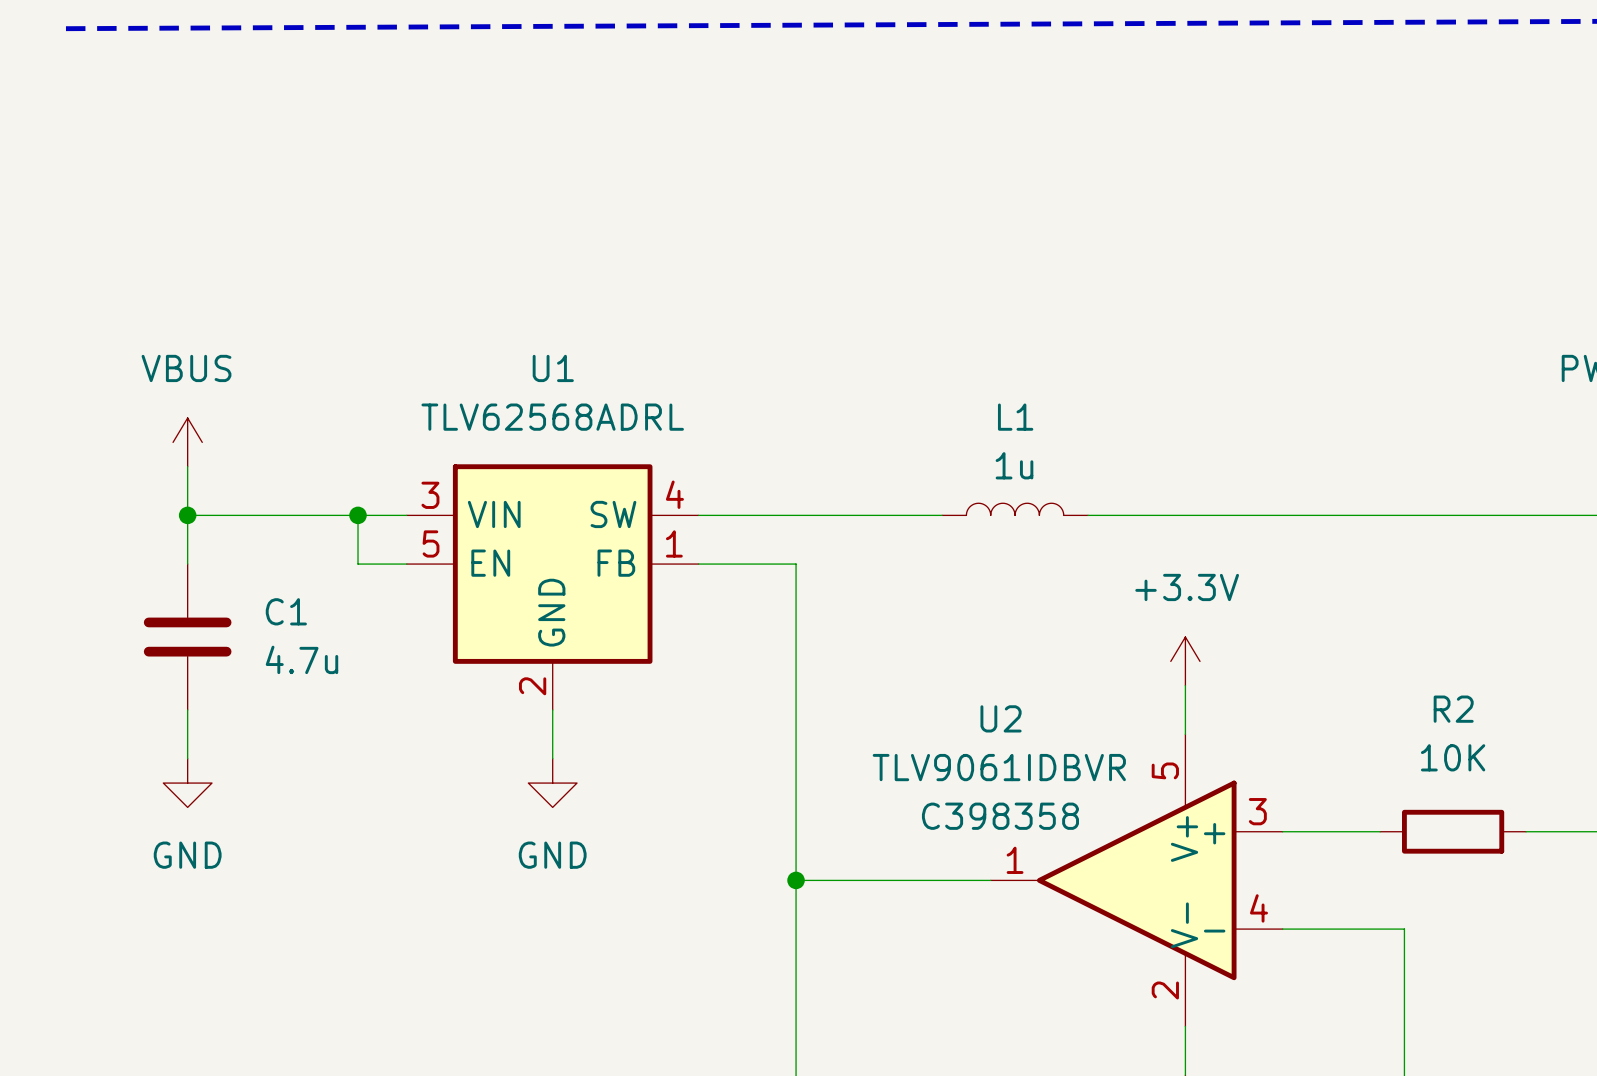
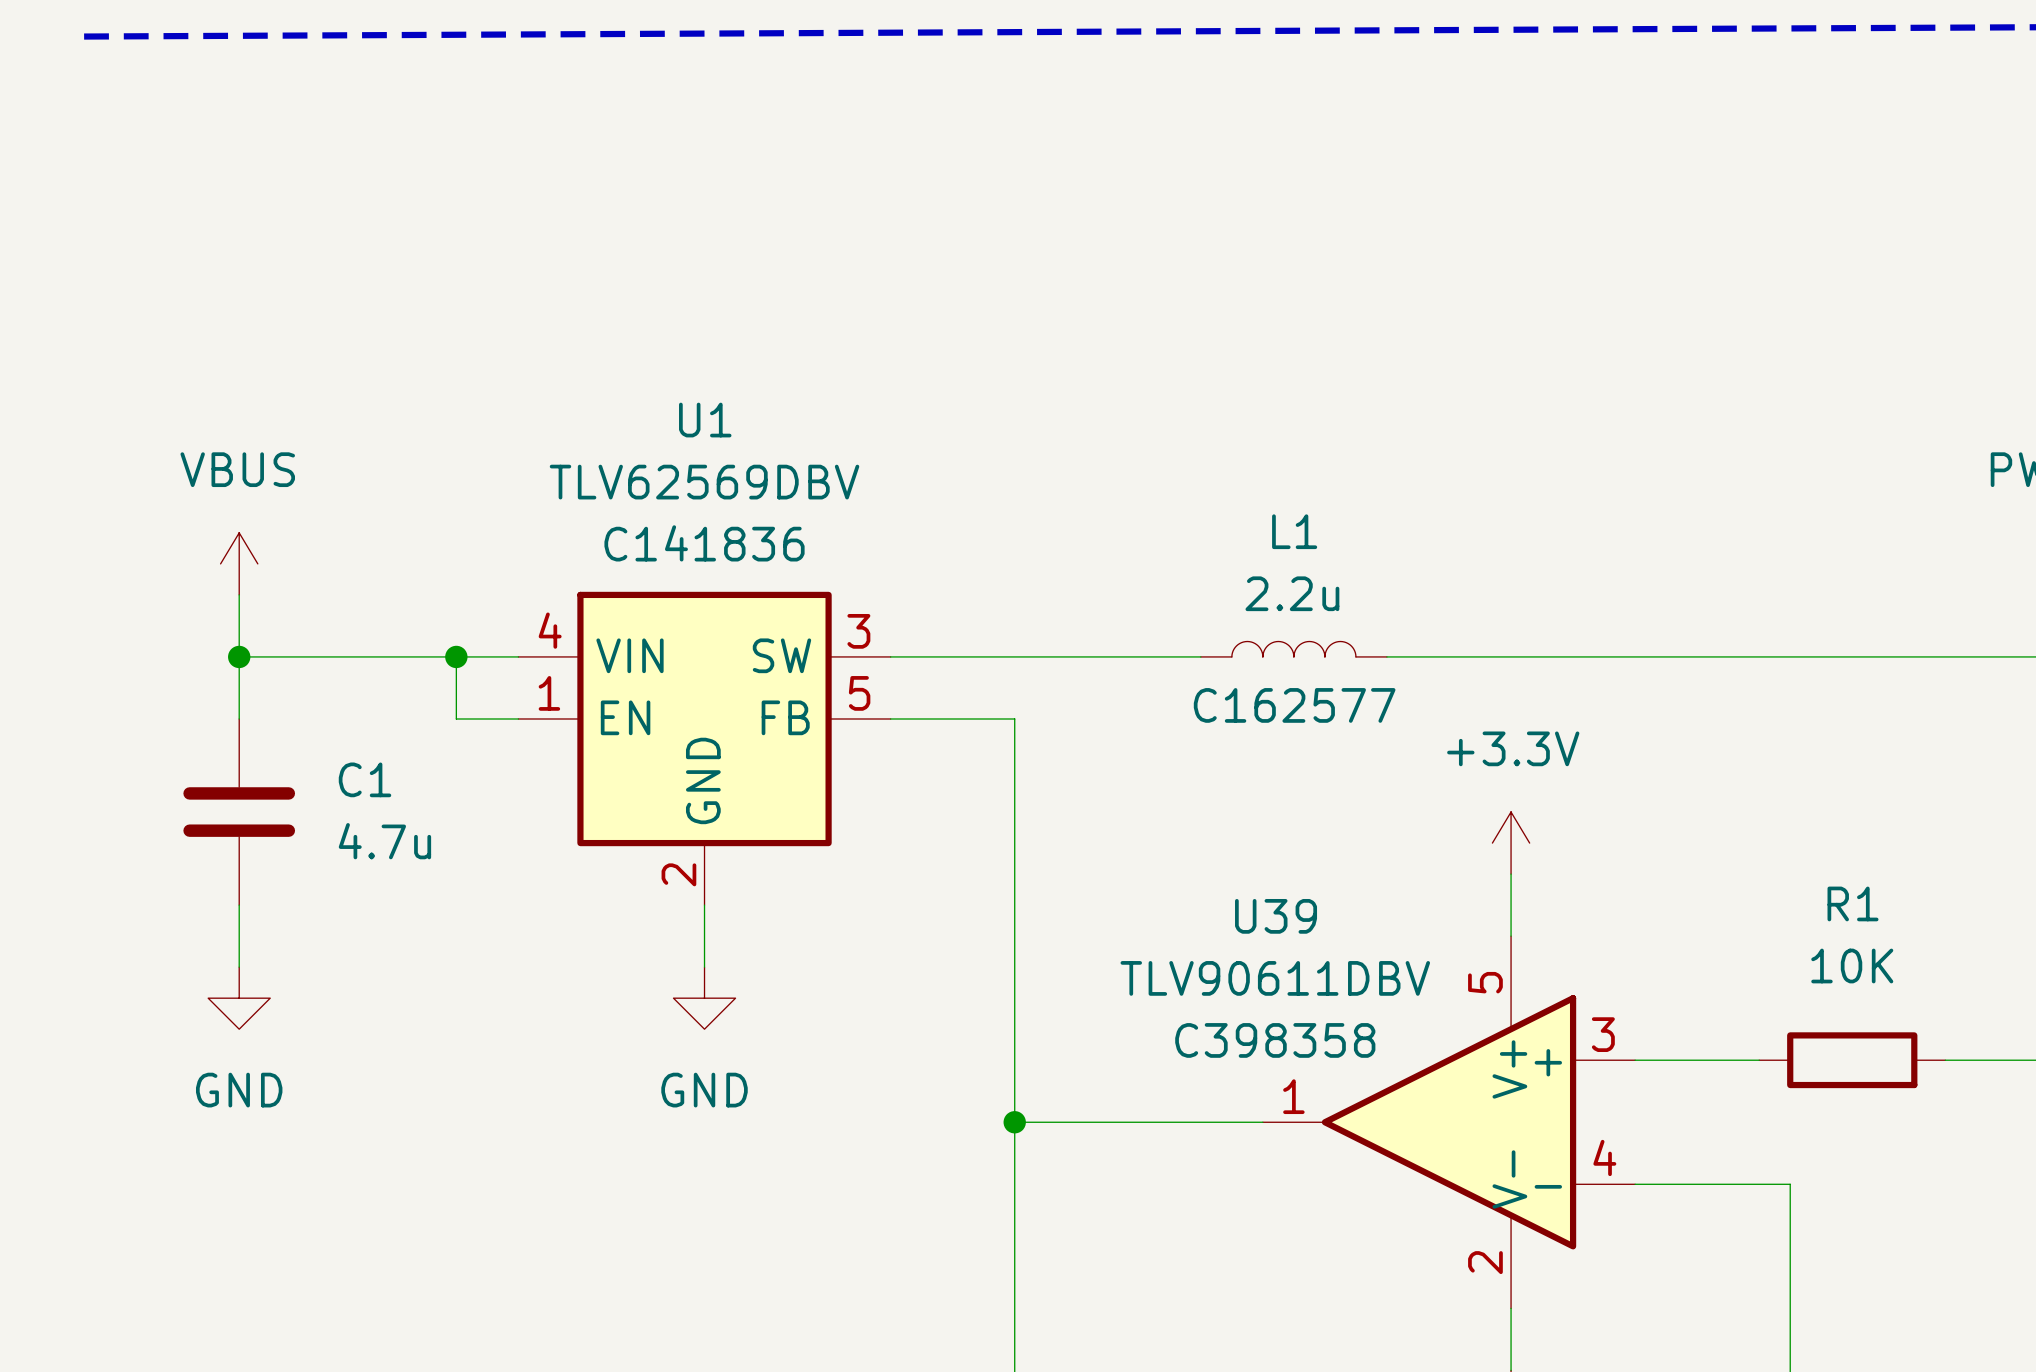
U1 name position: U1 (553, 368) -> U1 (705, 420)
U1 value: TLV62568ADRL (552, 417) -> TLV62569DBV (704, 482)
U1 text: none -> C141836 (704, 543)
L1 value: 1u (1014, 465) -> 2.2u (1292, 593)
U1 pin number: 4 (674, 494) -> 3 (858, 631)
U1 pin number: 3 (430, 495) -> 4 (550, 630)
U1 pin number: 5 (431, 543) -> 1 (549, 693)
U1 pin number: 1 (674, 543) -> 5 (859, 693)
L1 text: none -> C162577 (1294, 705)
R2 name: R2 (1453, 709) -> R1 (1853, 903)
U2 name: U2 (1001, 718) -> U39 (1276, 916)
U2 value: TLV9061IDBVR (999, 767) -> TLV90611DBV (1275, 978)

